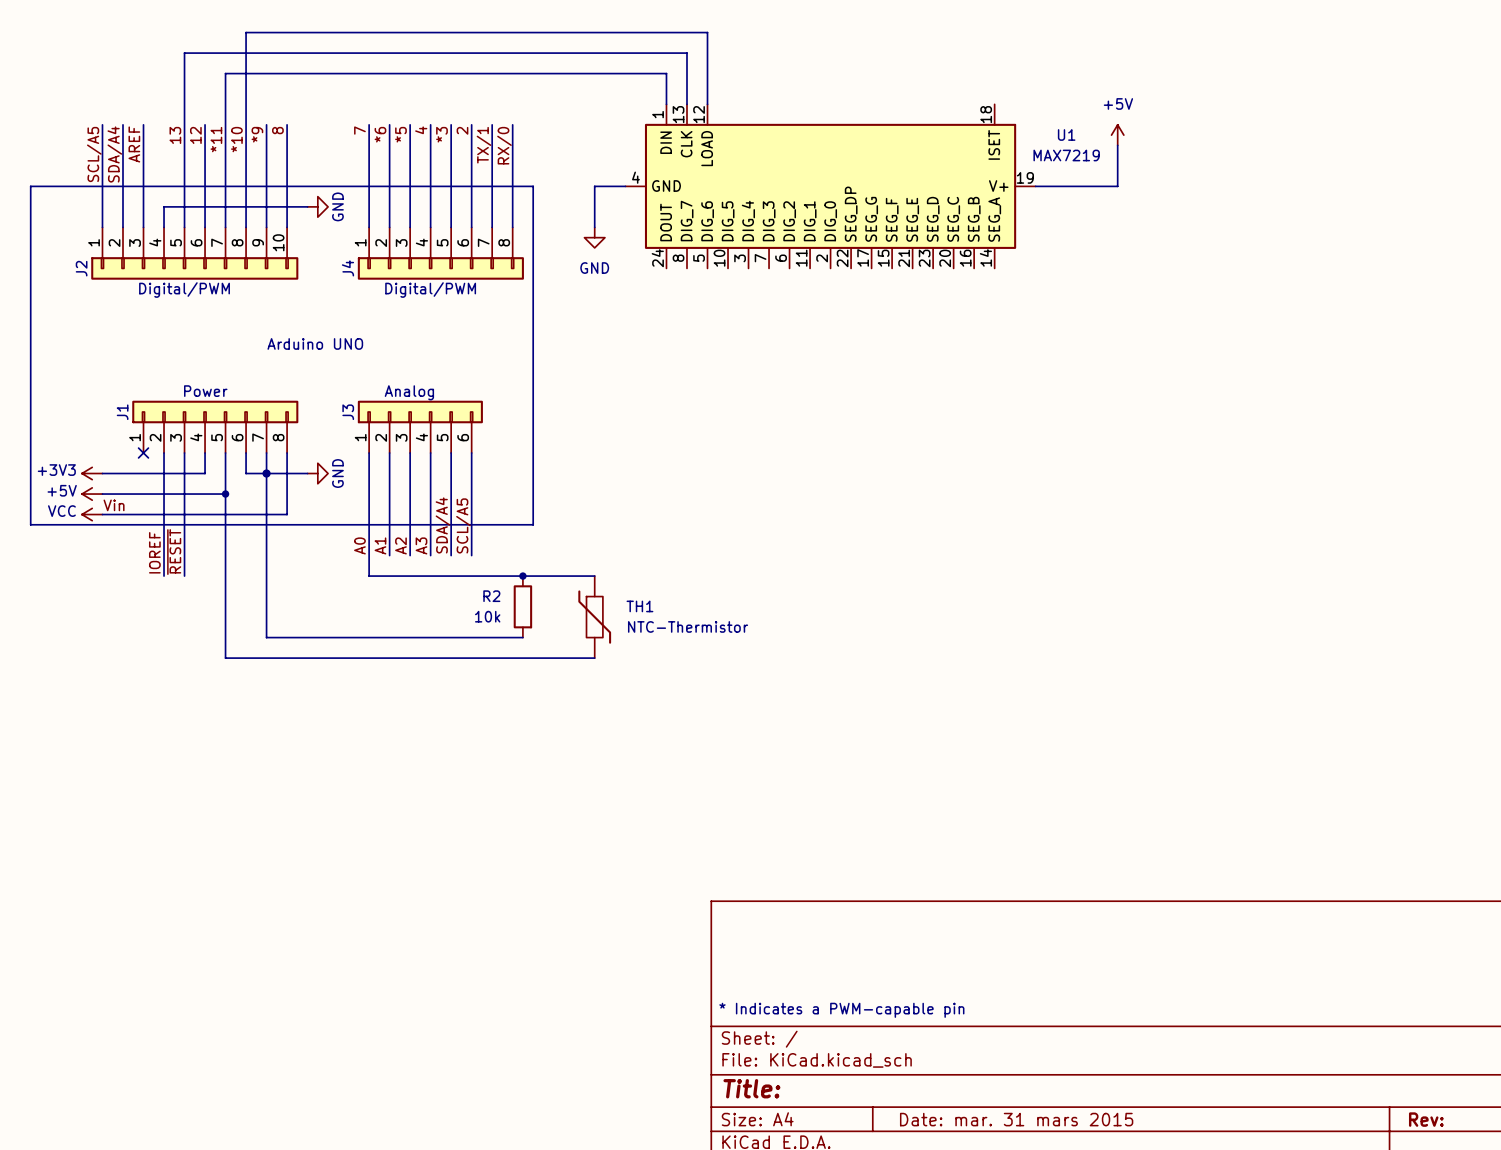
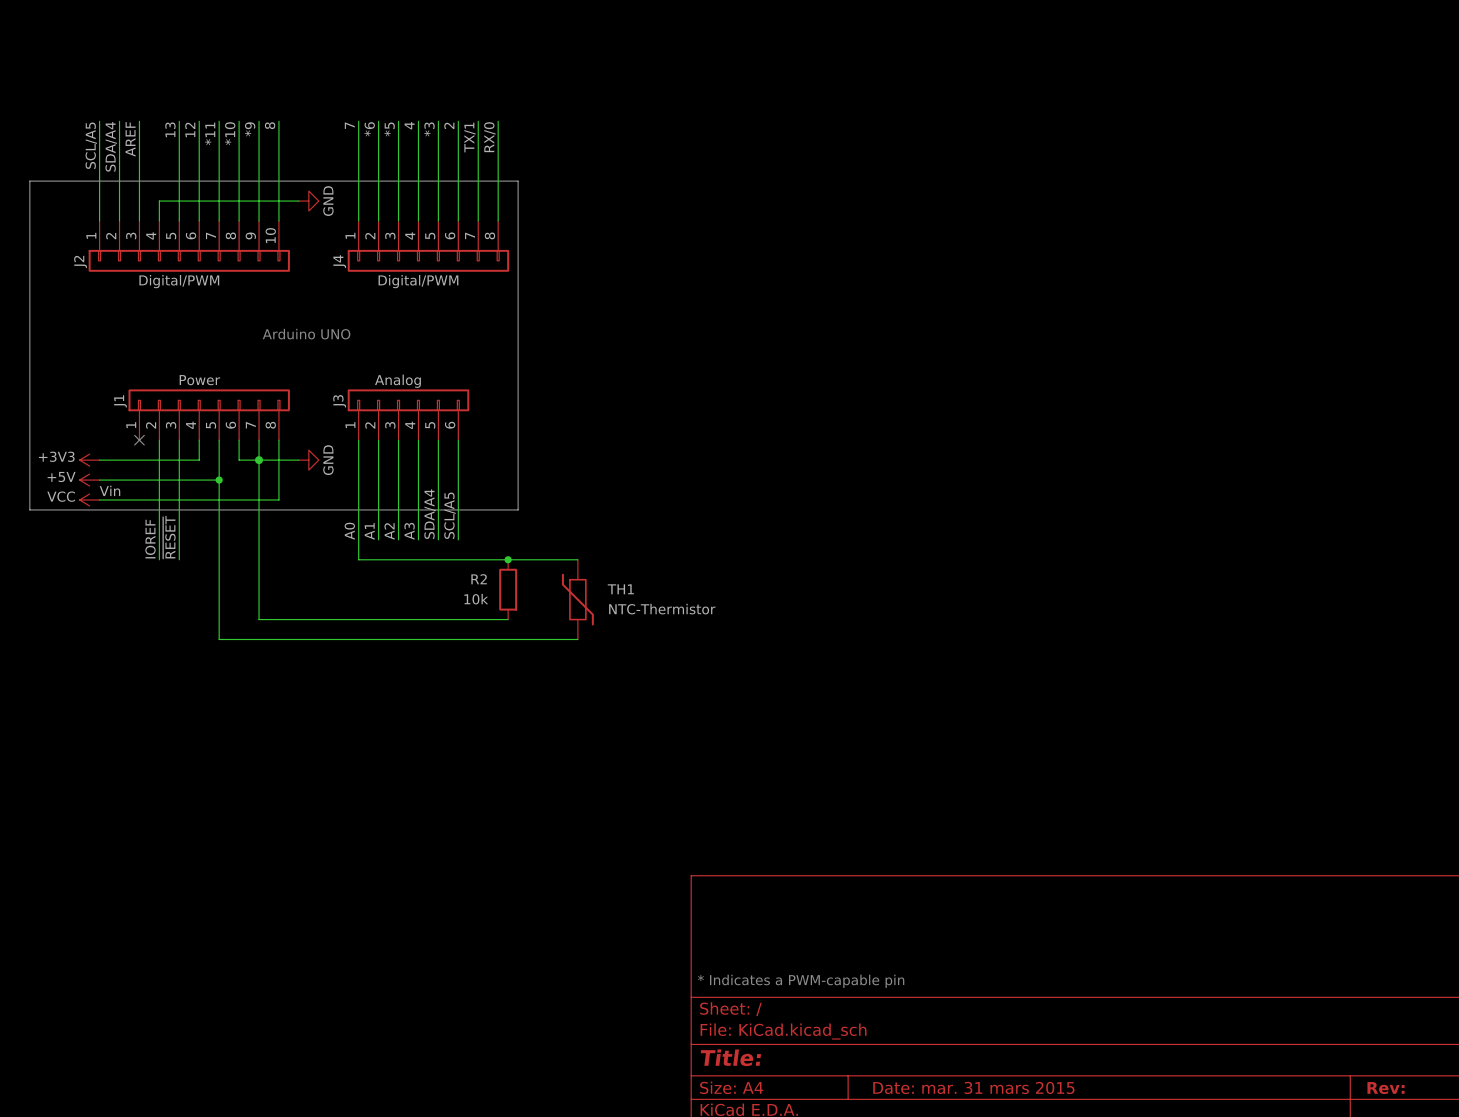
wire: (666, 104) (666, 73) (225, 73) (225, 124) -> none
wire: (686, 104) (686, 53) (184, 53) (184, 124) -> none
wire: (707, 104) (707, 32) (246, 32) (246, 124) -> none
power symbol: +5V (1117, 135) -> none
wire: (1117, 145) (1117, 186) (1035, 186) -> none
wire: (625, 186) (594, 186) (594, 227) -> none
U1: MAX7219 (830, 186) -> none
power symbol: GND (594, 237) -> none

